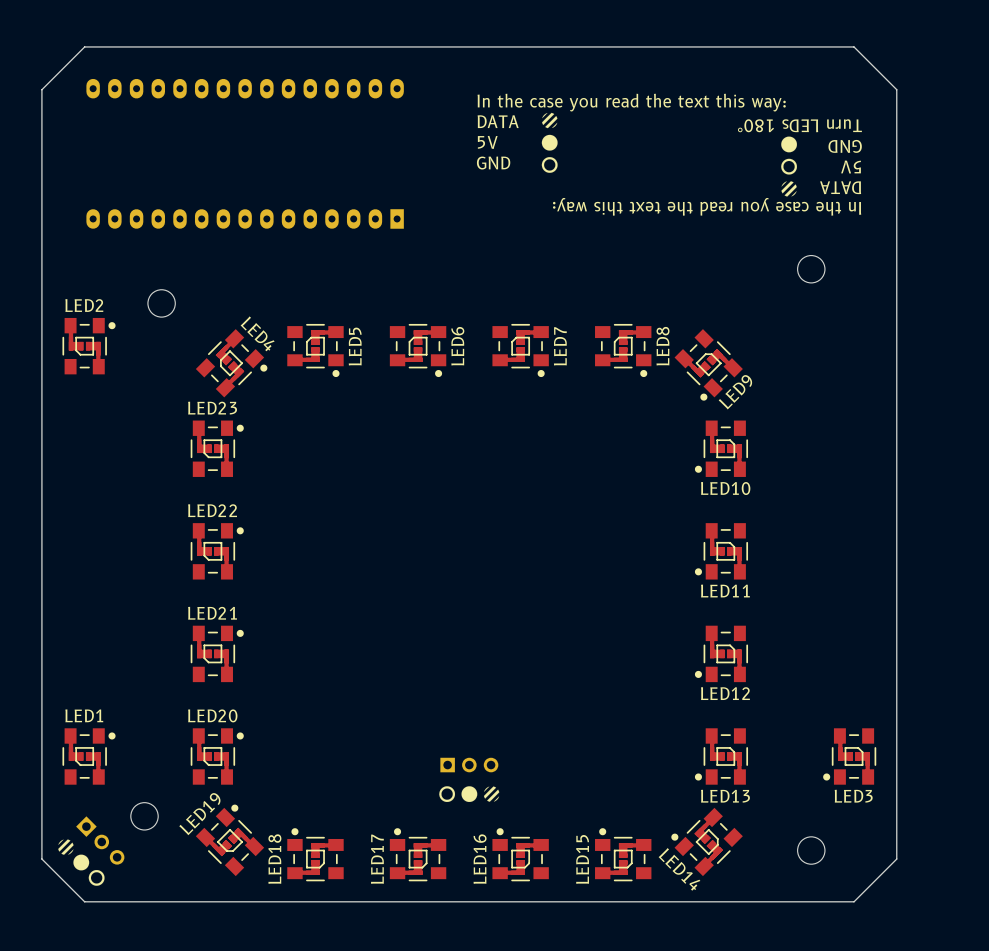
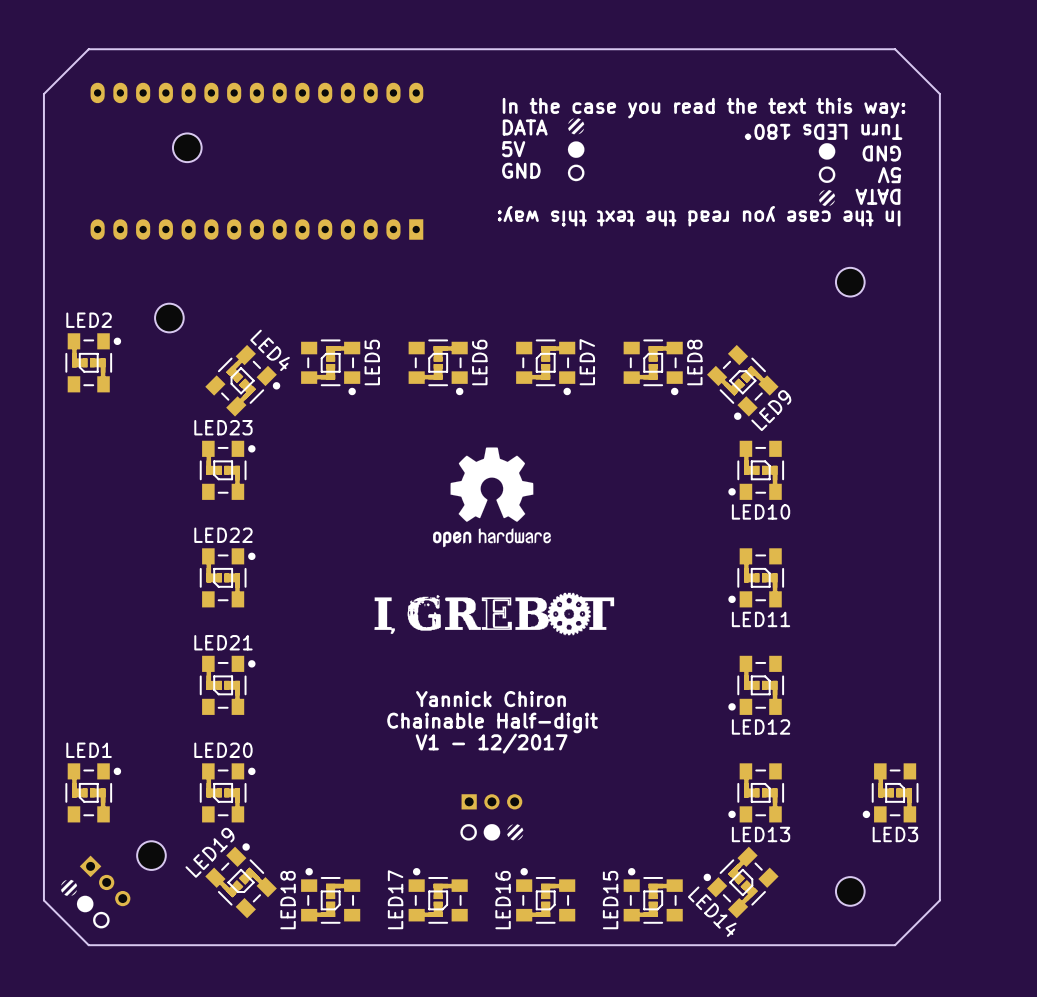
part: none -> (187, 147)
drawing: none -> [433, 447, 551, 548]
drawing: none -> [374, 592, 615, 636]
text: none -> Yannick Chiron (490, 699)
text: none -> Chainable Half-digit (492, 722)
text: none -> V1 - 12/2017 (491, 743)

